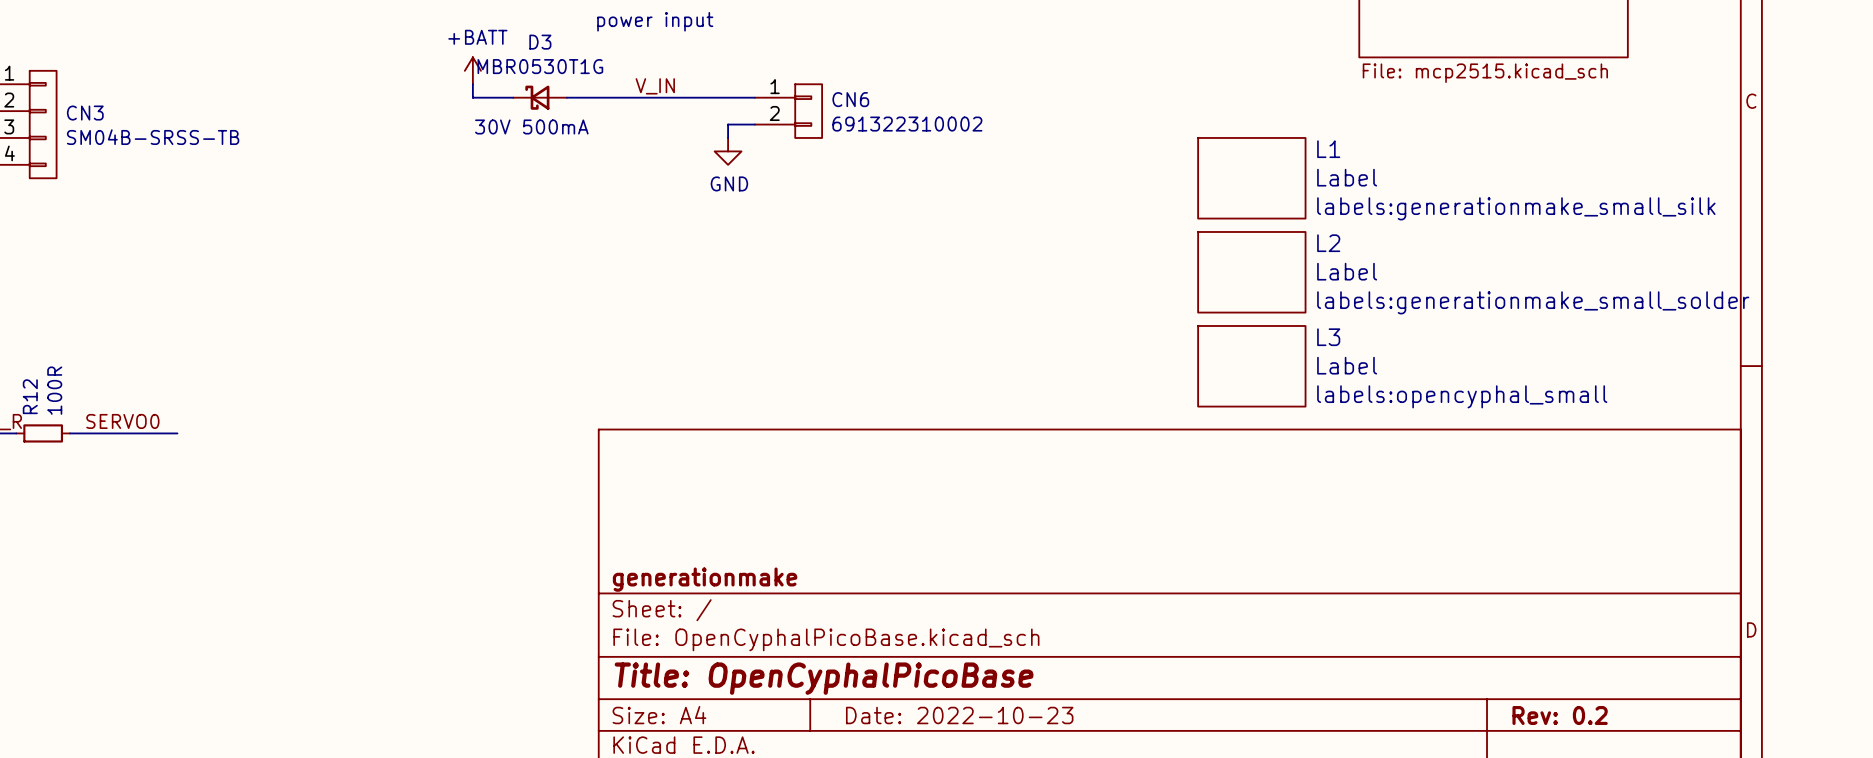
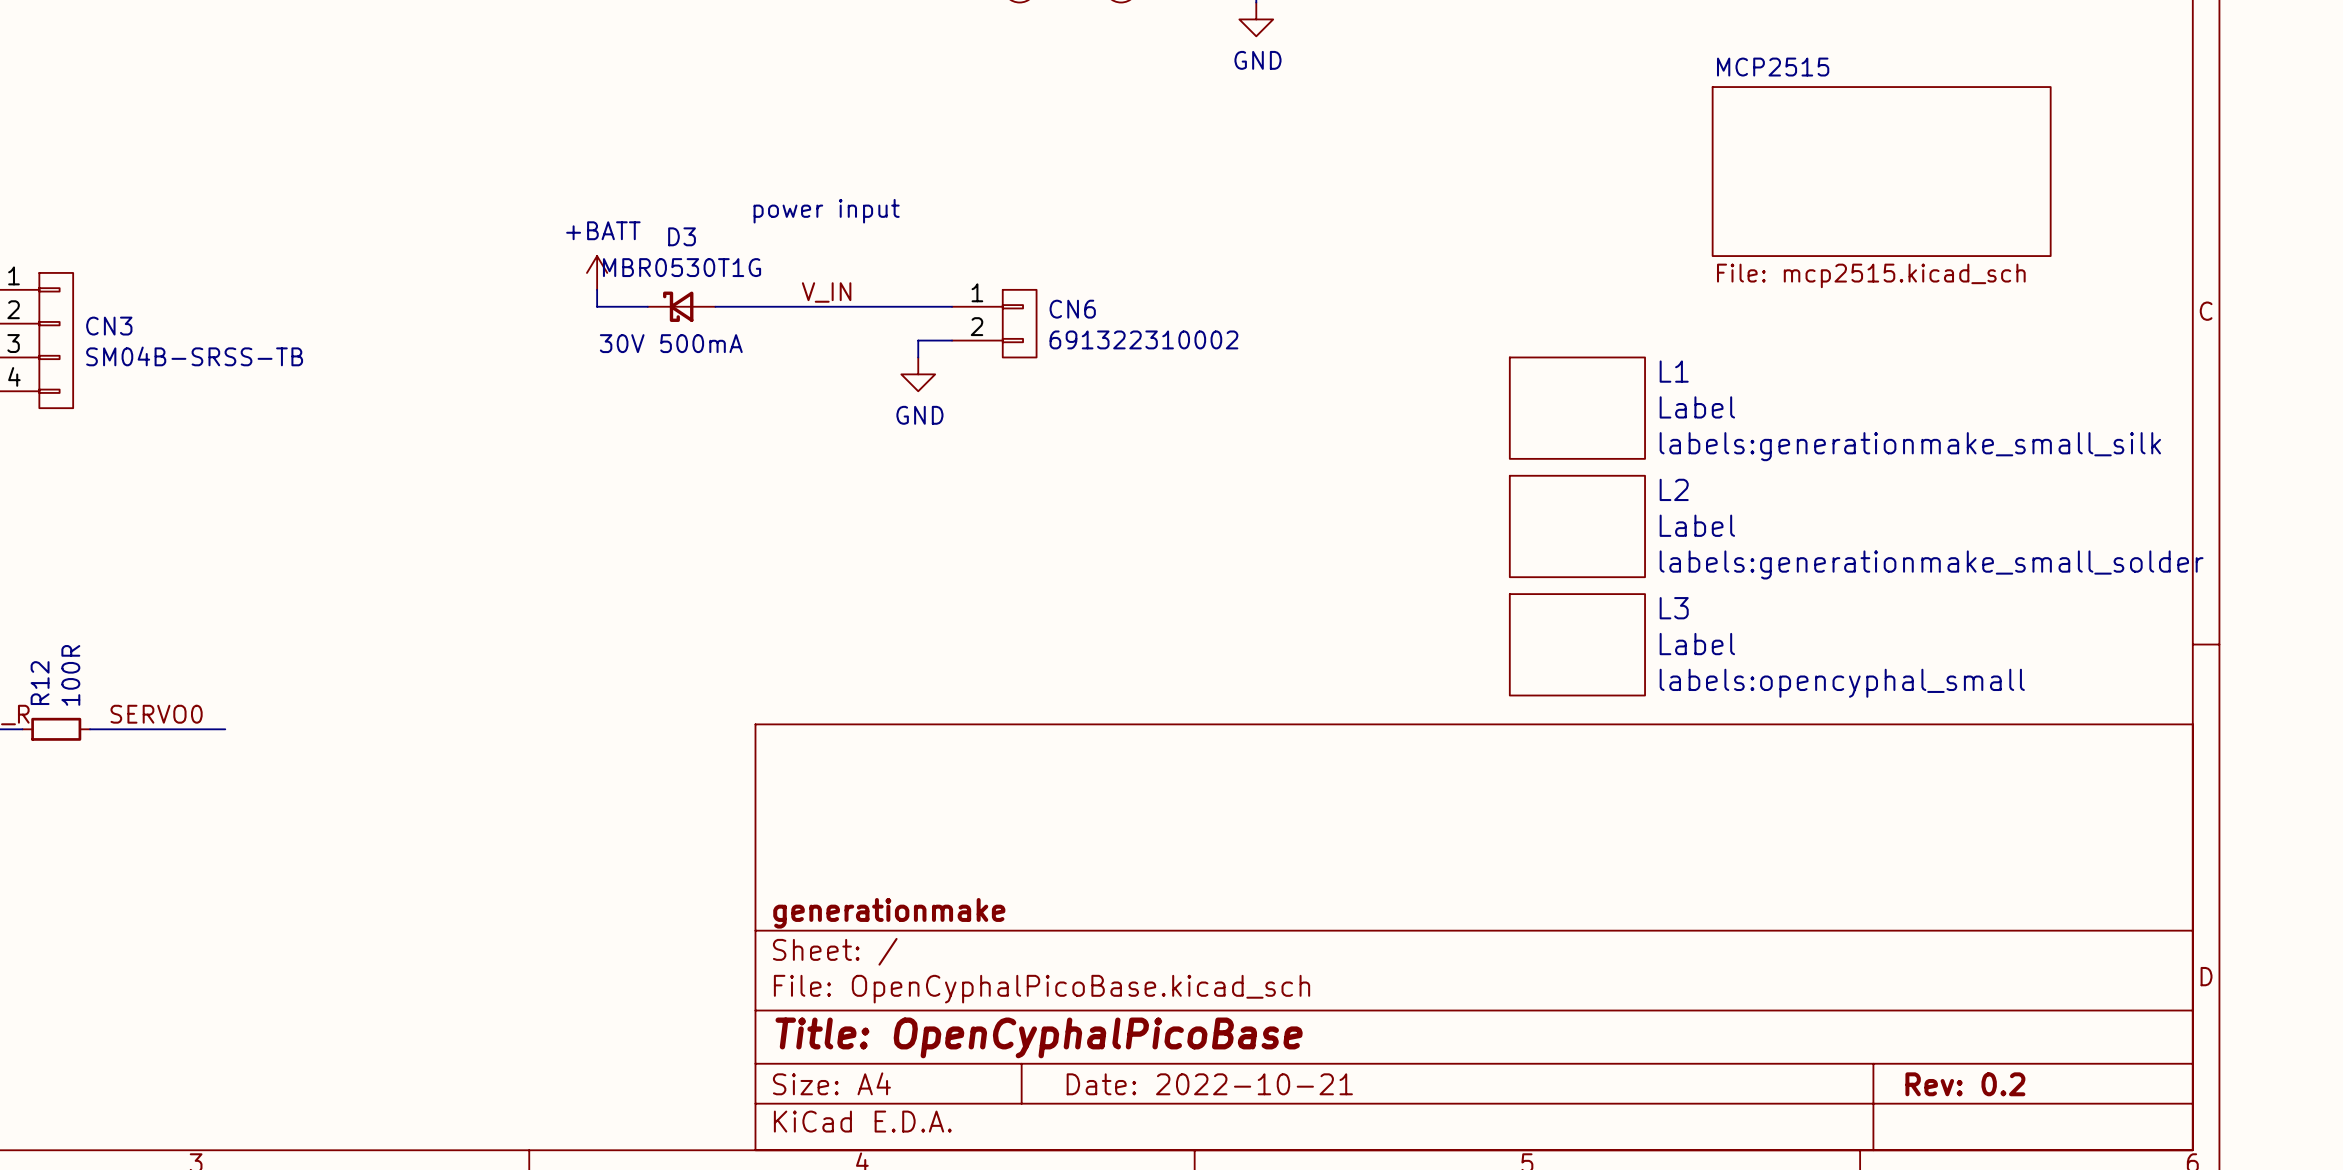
title block: Date: 2022-10-23 (959, 715) -> Date: 2022-10-21 (1209, 1084)

